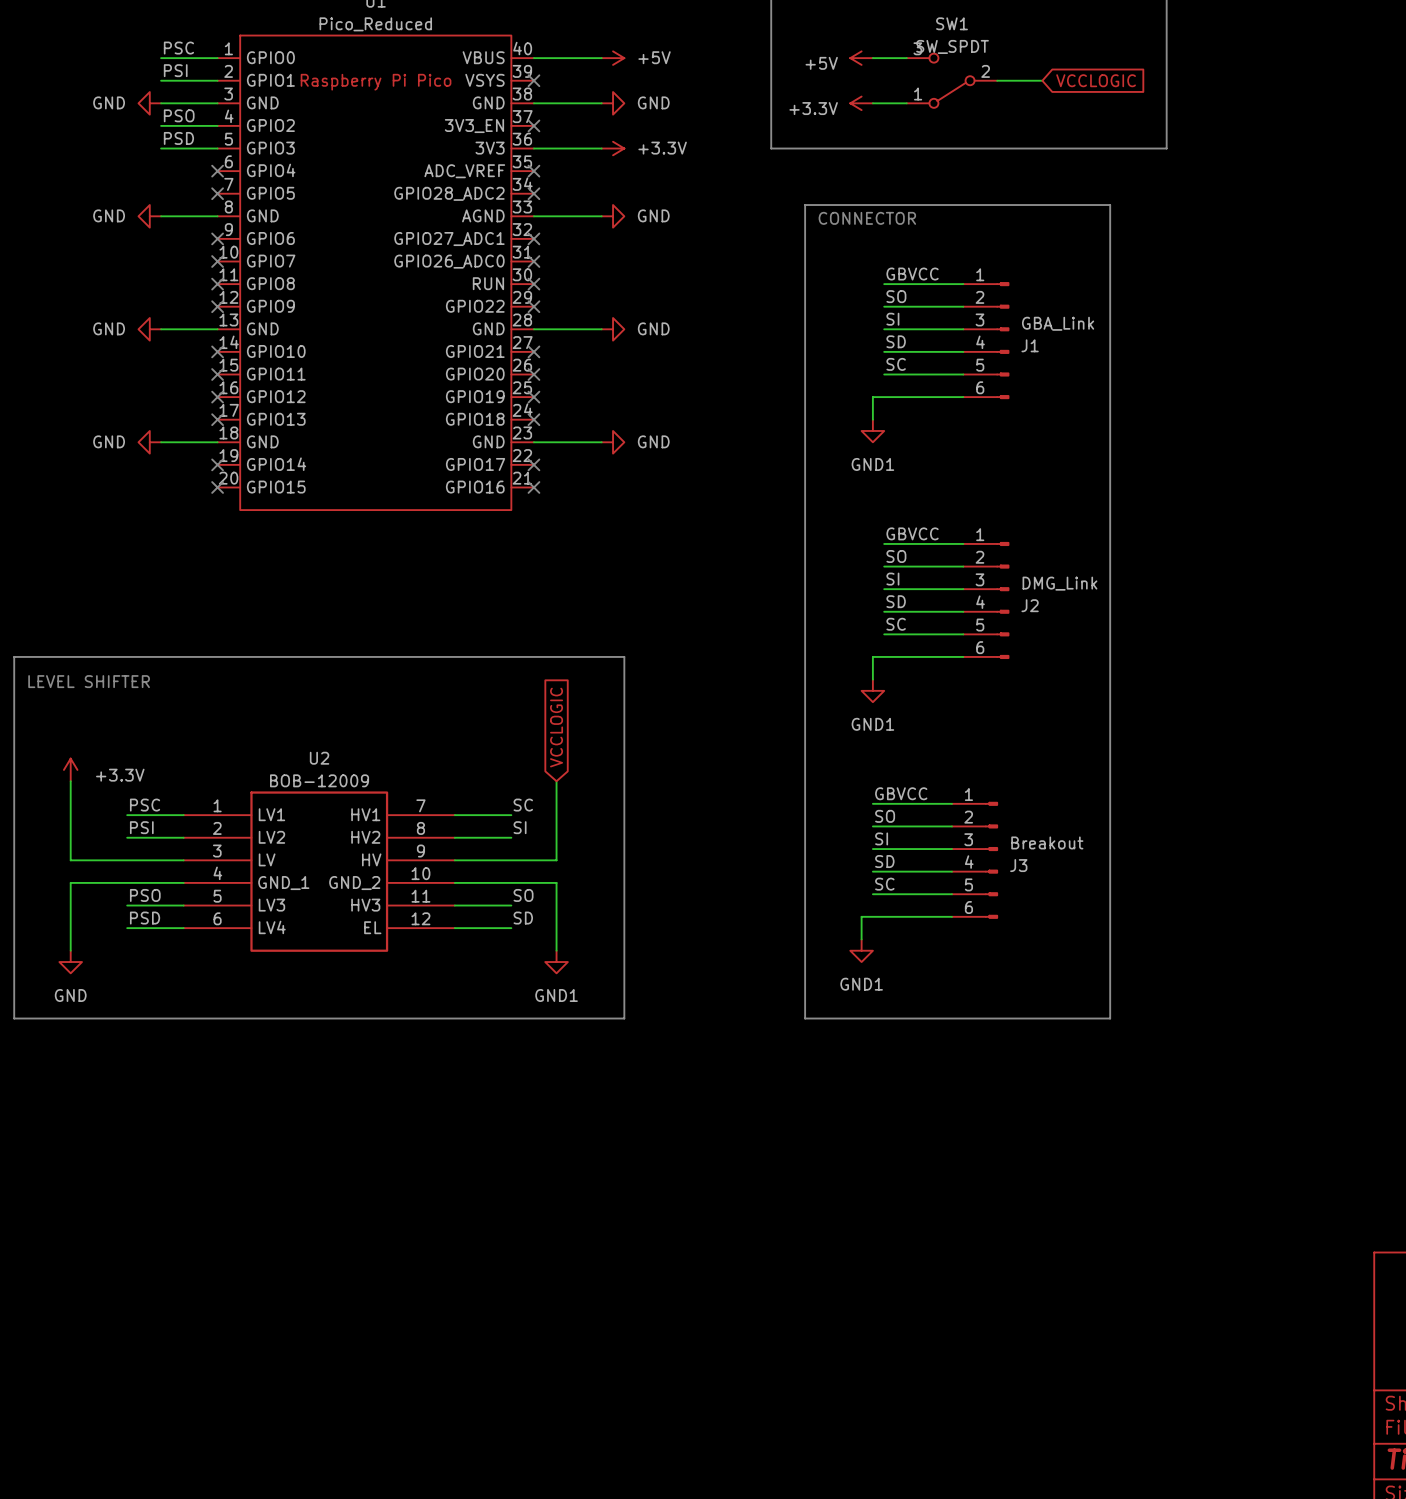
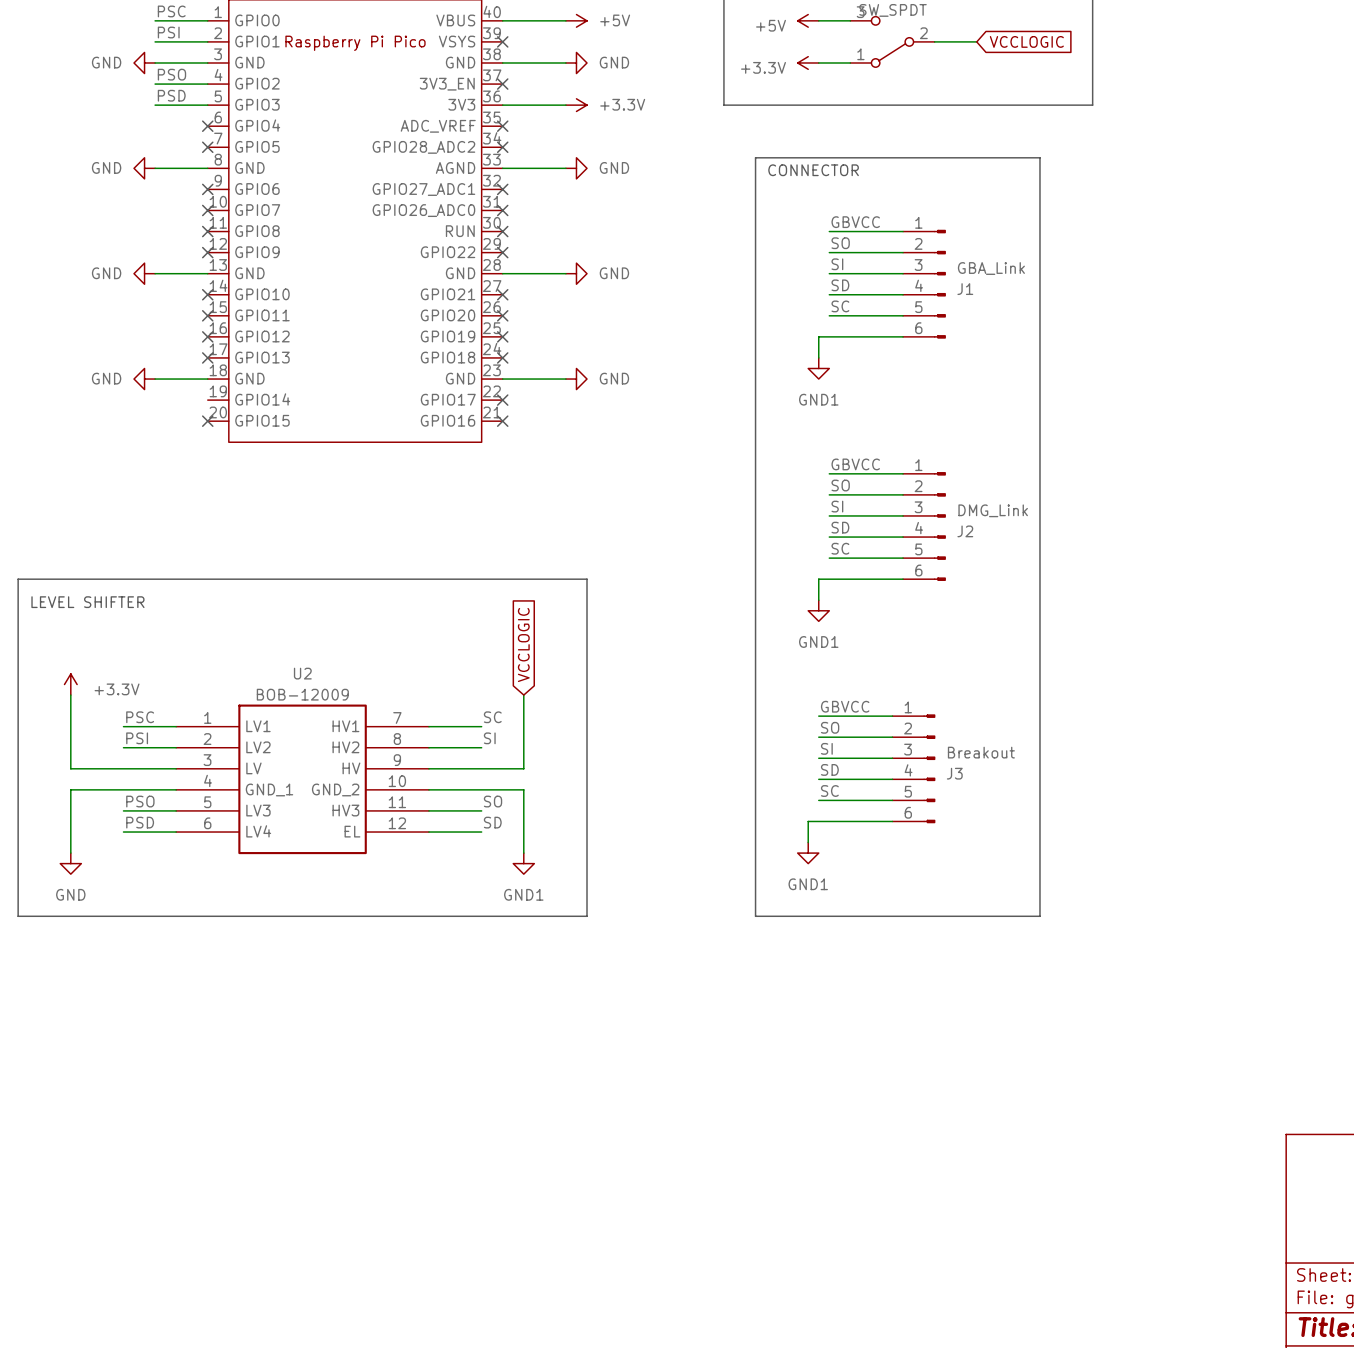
no-connect mark: (217, 464) -> none

